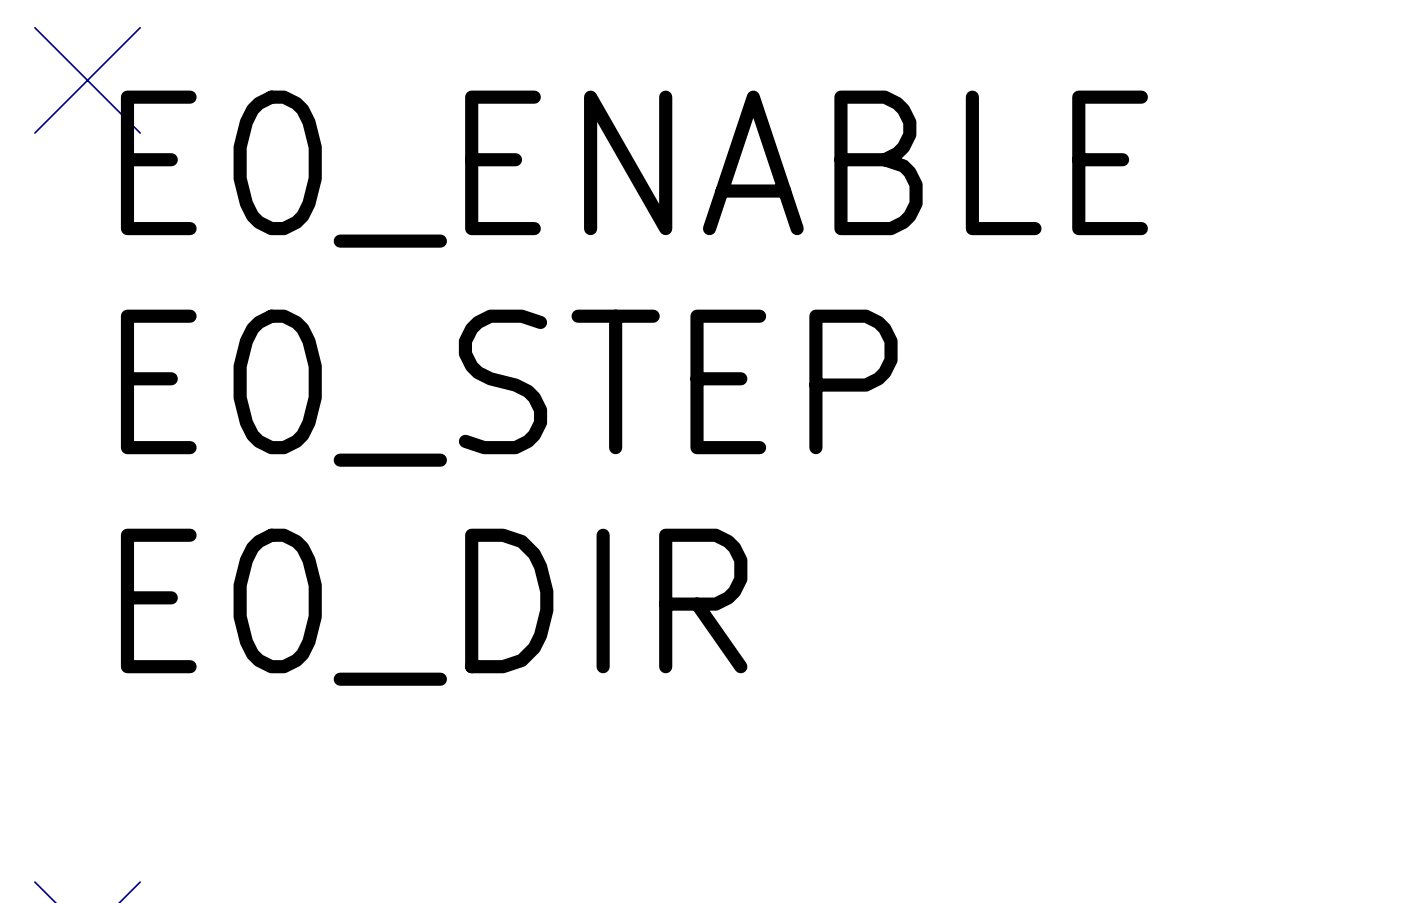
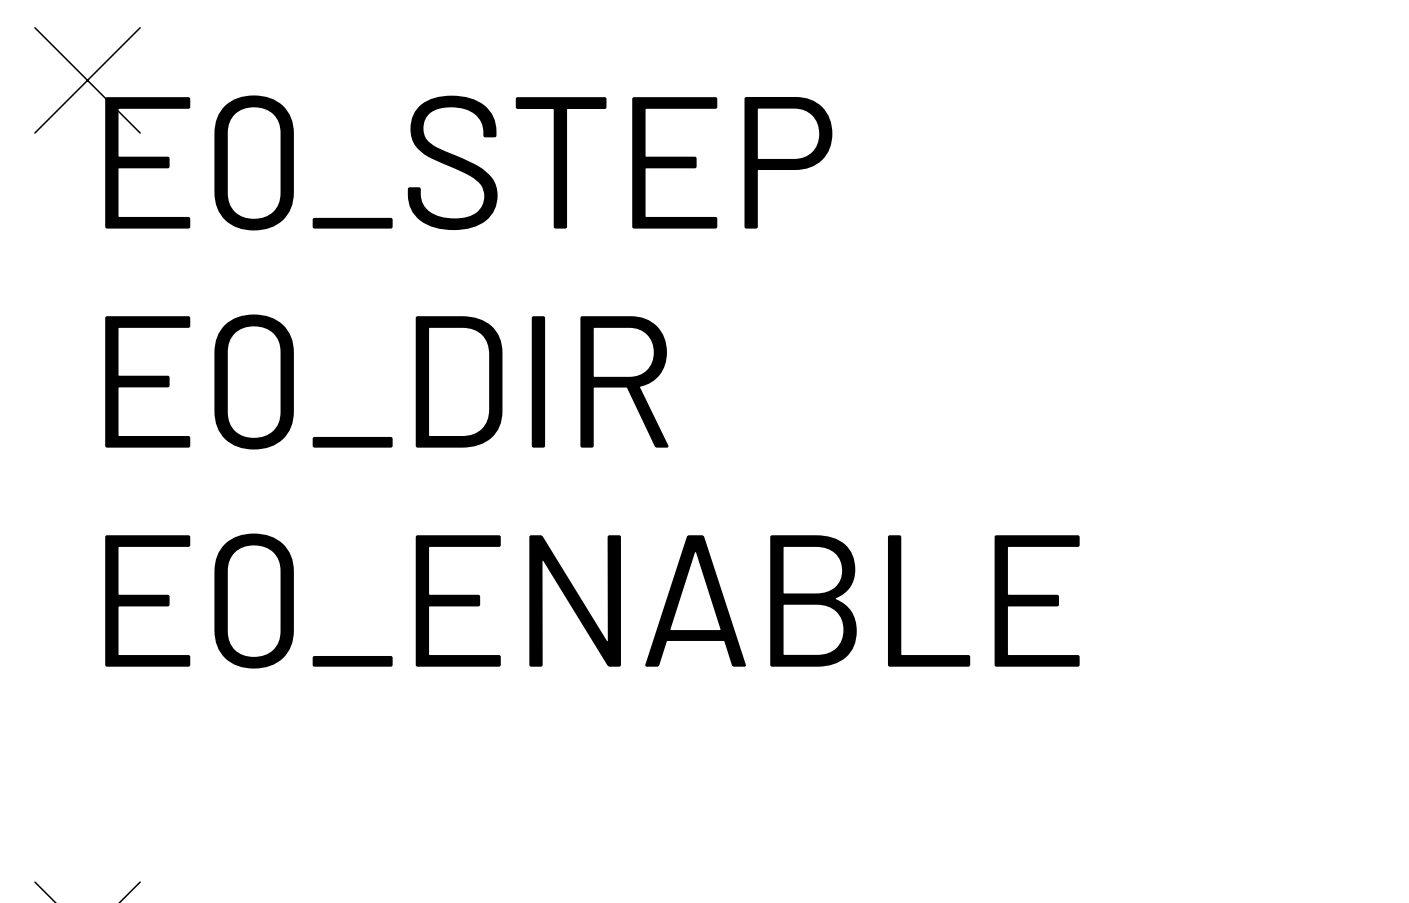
label: E0_ENABLE (634, 169) -> E0_STEP (468, 162)
label: E0_STEP (509, 388) -> E0_DIR (386, 382)
label: E0_DIR (434, 607) -> E0_ENABLE (592, 601)

